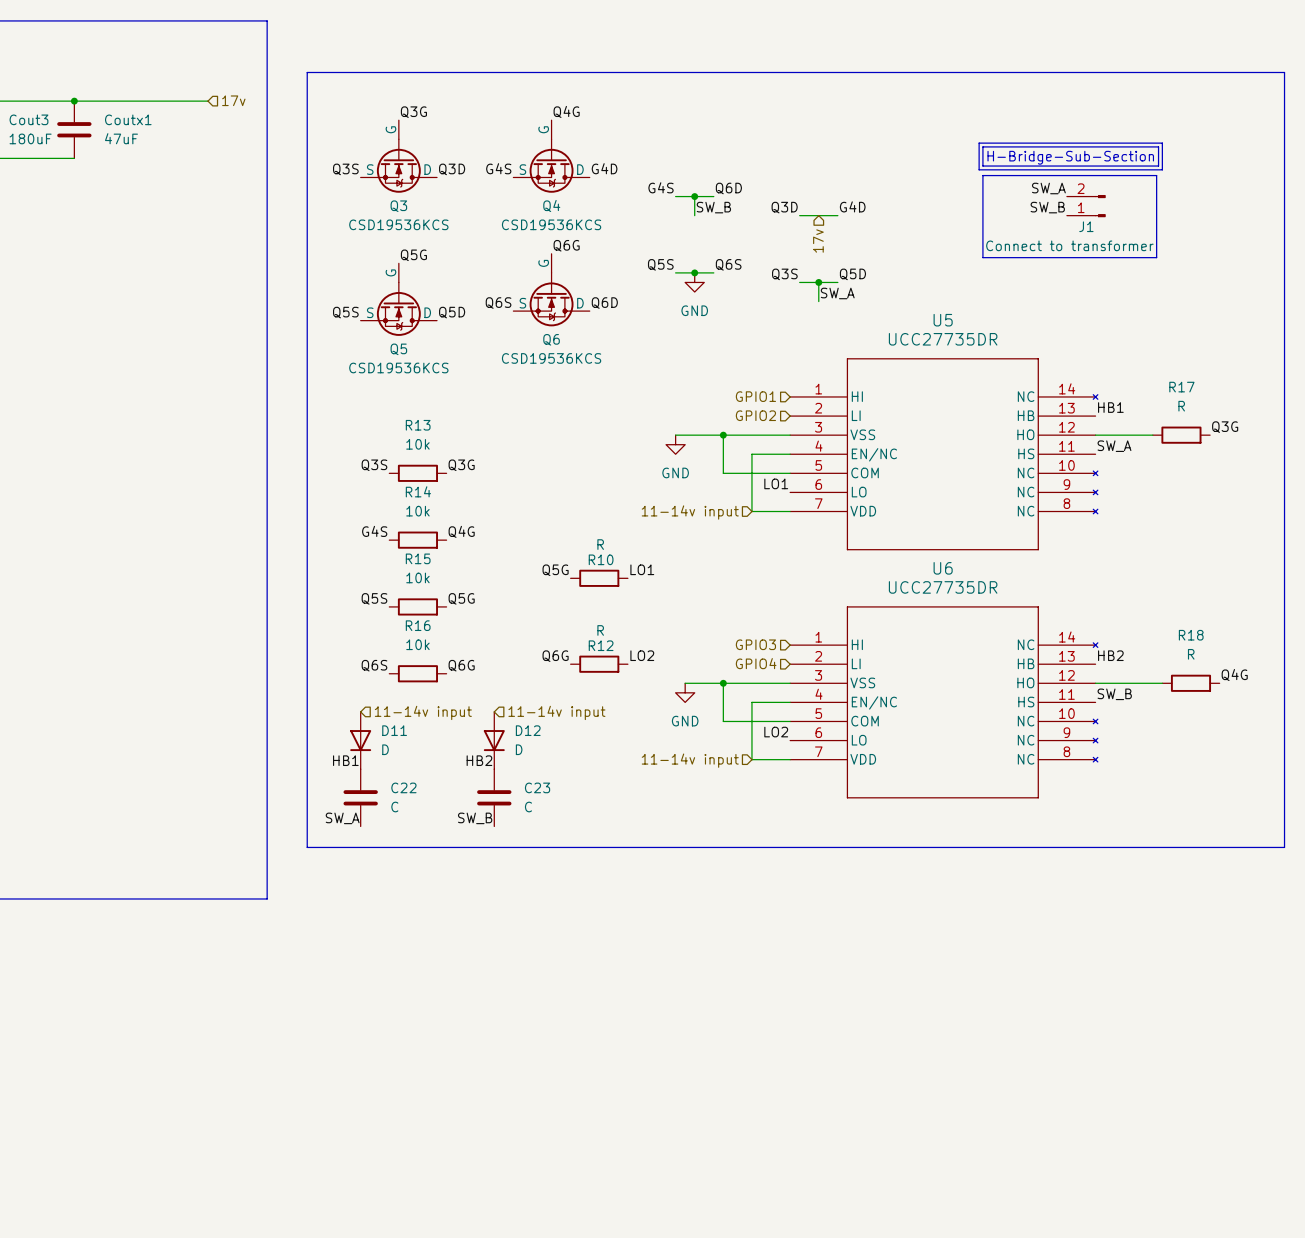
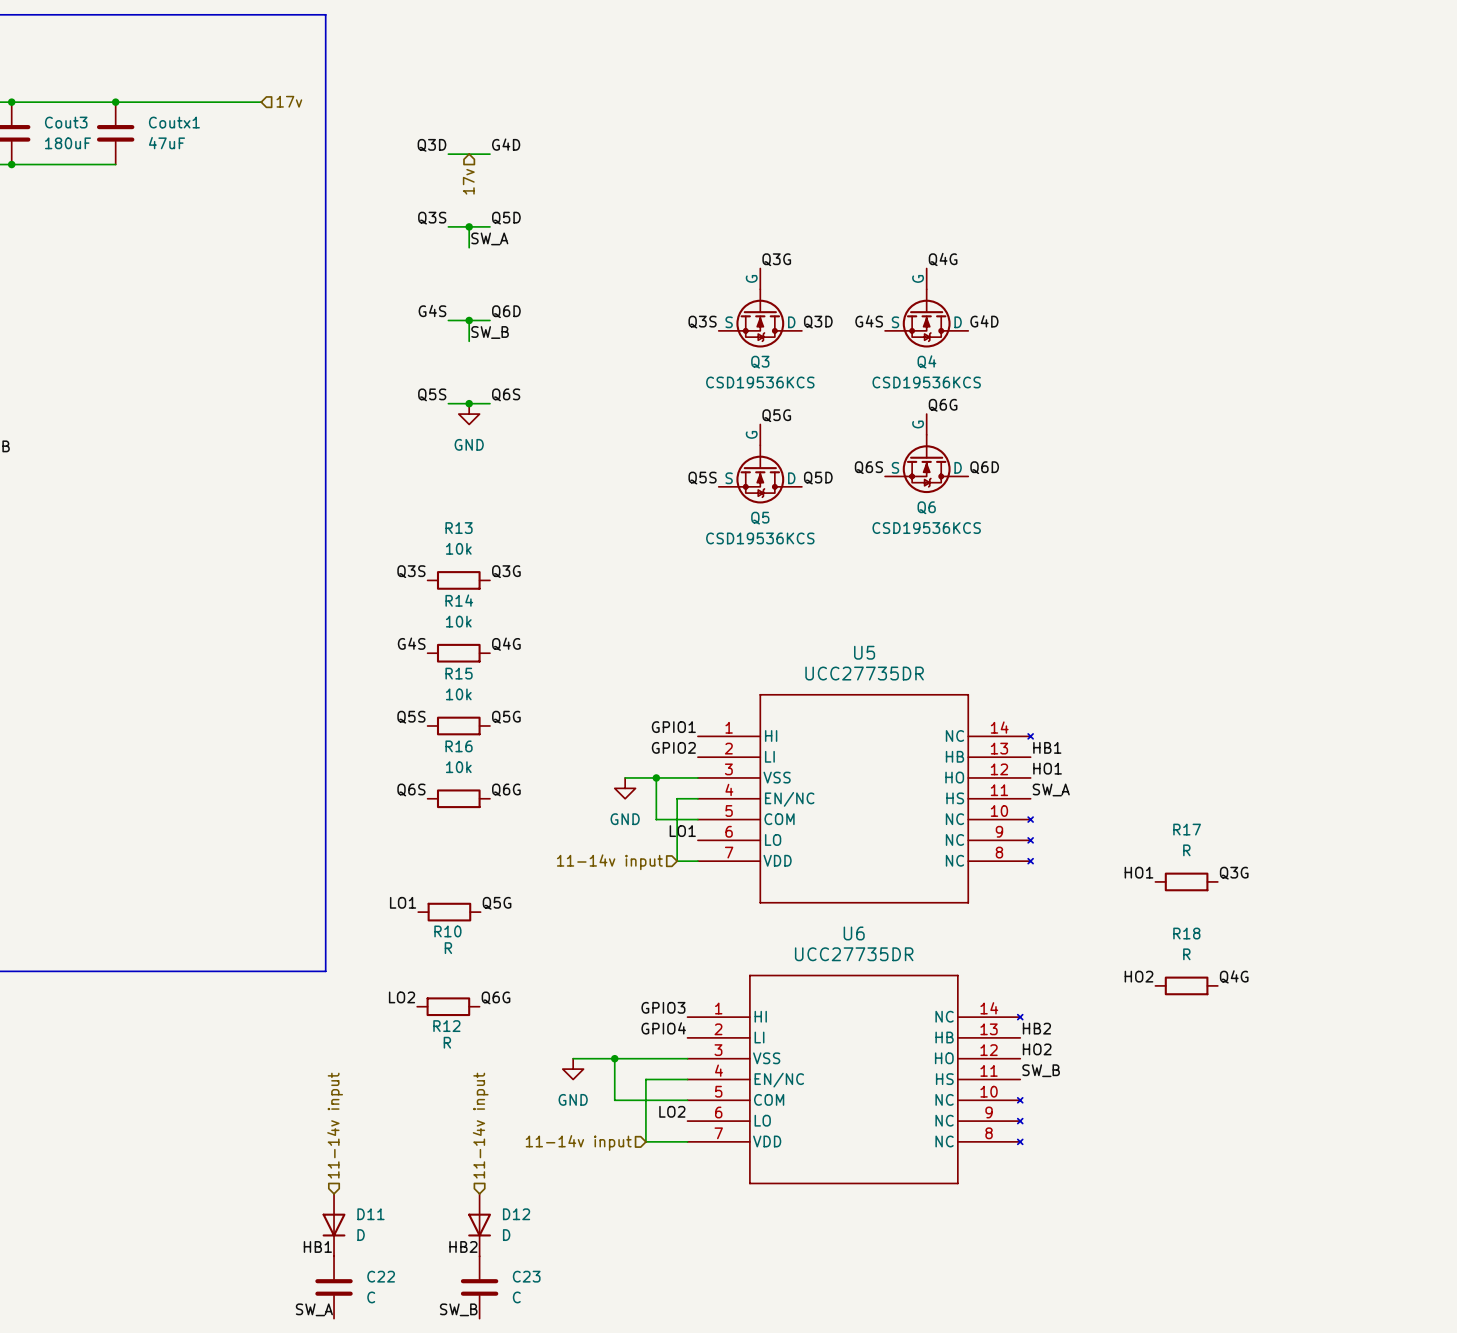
line: (307, 72) (1284, 72) (1284, 847) (307, 847) (307, 72) -> none
label: Q4G (566, 111) -> none
label: Q3G (413, 112) -> none
label: none -> G4D (506, 144)
line: (979, 143) (1162, 143) (1162, 169) (979, 169) (979, 143) -> none
line: (982, 146) (982, 166) (1158, 166) (1158, 146) (982, 146) -> none
wire: none -> (448, 154) (489, 154)
Q3 position: (398, 156) -> (760, 308)
Q4 position: (551, 156) -> (926, 308)
text: H-Bridge-Sub-Section (1070, 157) -> none
label: G4S (498, 168) -> none
label: G4D (604, 168) -> none
label position: Q3S (345, 169) -> Q3S (432, 218)
label position: Q3D (452, 169) -> Q3D (431, 145)
hierarchical label: none -> 17v (468, 181)
line: (982, 175) (1156, 175) (1156, 257) (982, 257) (982, 175) -> none
label: G4S (661, 187) -> none
label: Q6D (728, 188) -> none
label: SW_A (1048, 188) -> none
wire: (675, 196) (713, 196) -> none
wire: (694, 196) (694, 215) -> none
junction: (694, 196) -> none
label position: G4D (852, 206) -> G4D (984, 321)
J1: Connect to transformer (1086, 206) -> none
label: SW_B (713, 207) -> none
label position: Q3D (784, 207) -> Q3D (818, 322)
label: SW_B (1047, 207) -> none
wire: none -> (448, 226) (489, 226)
wire: none -> (469, 226) (469, 247)
junction: none -> (469, 226)
wire: (799, 215) (837, 215) -> none
label: none -> SW_A (489, 238)
hierarchical label: 17v (818, 241) -> none
label: Q6G (566, 245) -> none
label: none -> Q3G (776, 259)
label: none -> Q4G (943, 259)
label: Q5G (413, 255) -> none
label: Q5S (660, 264) -> none
label: Q6S (728, 264) -> none
wire: (675, 272) (713, 272) -> none
junction: (694, 272) -> none
label: Q3S (784, 274) -> none
label: Q5D (852, 274) -> none
power symbol: GND (694, 282) -> none
wire: (799, 282) (837, 282) -> none
junction: (818, 282) -> none
Q6 position: (551, 290) -> (926, 453)
label: none -> G4S (432, 310)
label: none -> Q6D (506, 311)
label: SW_A (837, 293) -> none
Q5 position: (398, 299) -> (760, 463)
wire: none -> (448, 320) (489, 320)
junction: none -> (469, 320)
label: none -> G4S (869, 321)
label position: Q6S (498, 303) -> Q6S (506, 394)
label: Q6D (604, 303) -> none
label: none -> Q3S (702, 322)
label position: Q5S (345, 312) -> Q5S (432, 394)
label: none -> SW_B (490, 332)
label position: Q5D (452, 312) -> Q5D (506, 218)
wire: none -> (448, 403) (489, 403)
junction: none -> (469, 403)
label: none -> Q6G (943, 405)
power symbol: none -> GND (469, 414)
label: none -> Q5G (776, 415)
hierarchical label: GPIO1 (755, 396) -> none
label: HB1 (1110, 407) -> none
hierarchical label: GPIO2 (755, 415) -> none
label: Q3G (1225, 427) -> none
wire: (675, 435) (790, 435) -> none
wire: (723, 435) (723, 473) (790, 473) -> none
junction: (723, 435) -> none
wire: (1095, 435) (1152, 435) -> none
R17 position: (1181, 435) -> (1186, 881)
label: none -> Q6S (868, 467)
label: none -> Q6D (984, 467)
power symbol: GND (675, 444) -> none
label: none -> Q5S (702, 478)
label: none -> Q5D (818, 478)
label: SW_A (1114, 446) -> none
wire: (790, 454) (751, 454) (751, 511) (790, 511) -> none
U5 position: (943, 454) -> (865, 798)
label position: Q3S (374, 465) -> Q3S (411, 571)
label position: Q3G (461, 465) -> Q3G (506, 571)
R13 position: (417, 473) -> (458, 580)
label: LO1 (776, 483) -> none
hierarchical label: 11-14v input (690, 512) -> none
label position: G4S (374, 531) -> G4S (411, 643)
label position: Q4G (461, 531) -> Q4G (506, 644)
R14 position: (417, 540) -> (458, 653)
R10 value position: R (600, 544) -> R (448, 948)
R10 name position: R10 (601, 559) -> R10 (447, 931)
label: LO1 (642, 569) -> none
label: Q5G (555, 570) -> none
R10 position: (599, 578) -> (449, 912)
label position: Q5S (374, 598) -> Q5S (411, 717)
label position: Q5G (461, 598) -> Q5G (506, 717)
R15 position: (417, 606) -> (458, 725)
R12 value position: R (600, 630) -> R (447, 1042)
hierarchical label: GPIO3 (755, 644) -> none
R12 name position: R12 (601, 645) -> R12 (446, 1026)
label: LO2 (642, 655) -> none
label: HB2 (1110, 655) -> none
label: Q6G (555, 656) -> none
hierarchical label: GPIO4 (756, 663) -> none
R12 position: (599, 664) -> (448, 1006)
label position: Q6S (374, 665) -> Q6S (411, 789)
label position: Q6G (461, 665) -> Q6G (506, 789)
R16 position: (417, 673) -> (458, 798)
label: none -> GPIO1 (673, 727)
label: Q4G (1234, 675) -> none
wire: (685, 683) (790, 683) -> none
wire: (723, 683) (723, 721) (790, 721) -> none
junction: (723, 683) -> none
wire: (1095, 683) (1162, 683) -> none
R18 position: (1190, 683) -> (1186, 985)
power symbol position: GND (685, 692) -> GND (625, 788)
label: none -> GPIO2 (673, 747)
label: none -> HB1 (1047, 747)
label: SW_B (1114, 694) -> none
wire: (790, 702) (751, 702) (751, 759) (790, 759) -> none
U6 position: (943, 702) -> (855, 1079)
hierarchical label: 11-14v input (423, 712) -> none
hierarchical label: 11-14v input (556, 712) -> none
label: none -> HO1 (1047, 768)
wire: none -> (625, 777) (697, 777)
wire: none -> (656, 777) (656, 819) (697, 819)
junction: none -> (656, 777)
label: LO2 (776, 732) -> none
label: none -> SW_A (1051, 789)
D11 position: (360, 740) -> (334, 1225)
D12 position: (494, 740) -> (479, 1225)
wire: none -> (697, 798) (677, 798) (677, 861) (697, 861)
label: HB1 (345, 760) -> none
label: HB2 (479, 760) -> none
hierarchical label: 11-14v input (690, 760) -> none
label: none -> LO1 (682, 831)
C22 position: (360, 797) -> (334, 1287)
C23 position: (494, 797) -> (479, 1287)
hierarchical label: none -> 11-14v input (609, 862)
label: none -> HO1 (1138, 872)
label: none -> Q3G (1234, 873)
label: SW_A (342, 818) -> none
label: SW_B (475, 818) -> none
label: none -> LO1 (403, 902)
label: none -> Q5G (497, 903)
label: none -> HO2 (1138, 976)
label: none -> Q4G (1234, 976)
label: none -> LO2 (402, 997)
label: none -> Q6G (496, 997)
label: none -> GPIO3 (663, 1007)
label: none -> GPIO4 (663, 1028)
label: none -> HB2 (1036, 1028)
label: none -> HO2 (1037, 1049)
wire: none -> (573, 1058) (687, 1058)
wire: none -> (614, 1058) (614, 1100) (687, 1100)
junction: none -> (614, 1058)
power symbol: none -> GND (573, 1069)
label: none -> SW_B (1041, 1070)
wire: none -> (687, 1079) (645, 1079) (645, 1141) (687, 1141)
label: none -> LO2 (672, 1111)
hierarchical label: none -> 11-14v input (335, 1125)
hierarchical label: none -> 11-14v input (480, 1125)
hierarchical label: none -> 11-14v input (578, 1142)
label: none -> HB1 (317, 1246)
label: none -> HB2 (463, 1246)
label: none -> SW_A (314, 1309)
label: none -> SW_B (458, 1309)

